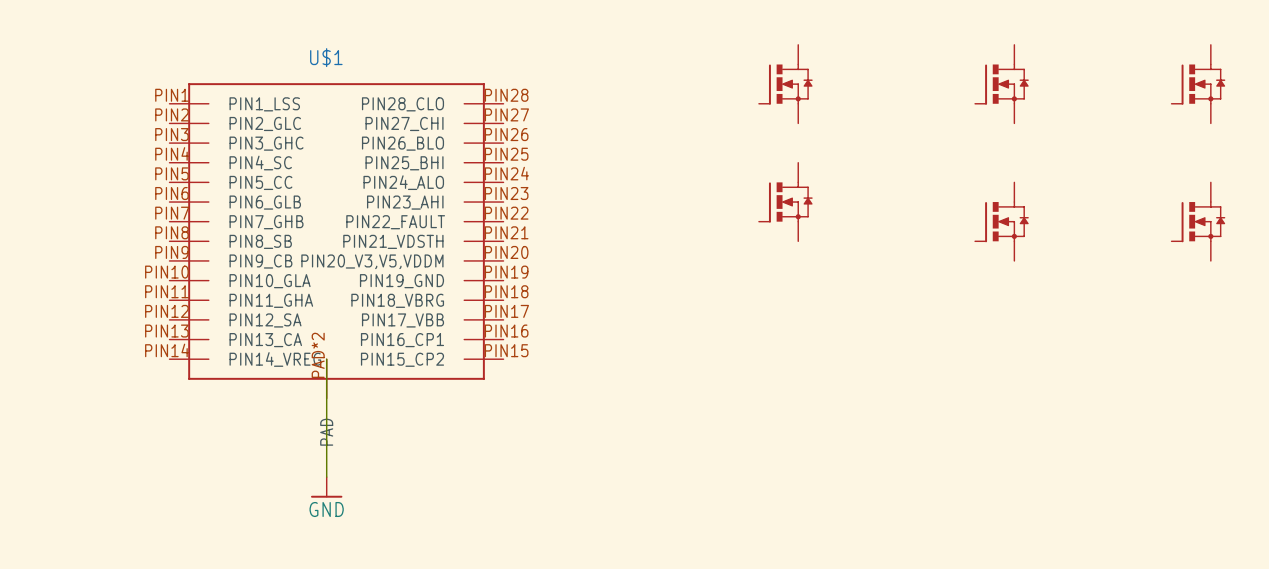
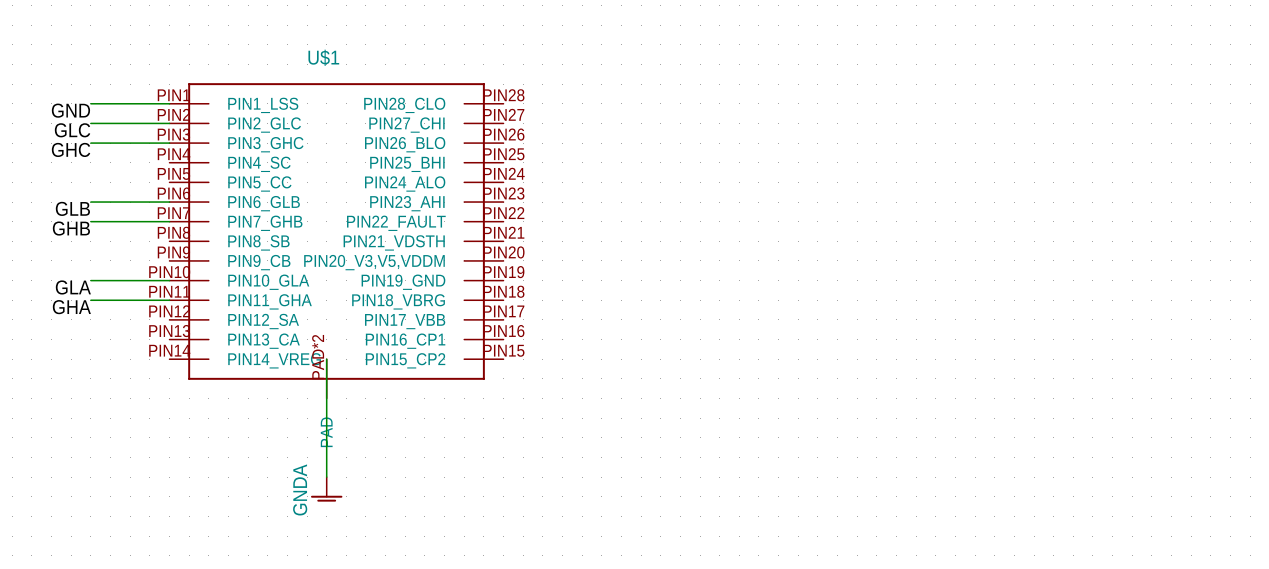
part: (785, 84) -> none
part: (1001, 84) -> none
part: (1198, 84) -> none
wire: none -> (90, 103) (169, 103)
label: none -> GND (70, 110)
wire: none -> (90, 123) (169, 123)
label: none -> GLC (72, 130)
wire: none -> (90, 143) (169, 143)
label: none -> GHC (71, 149)
wire: none -> (90, 202) (169, 202)
part: (785, 202) -> none
label: none -> GLB (72, 208)
wire: none -> (90, 221) (169, 221)
part: (1001, 221) -> none
part: (1198, 221) -> none
label: none -> GHB (71, 228)
wire: none -> (90, 280) (169, 280)
label: none -> GLA (73, 287)
wire: none -> (90, 300) (169, 300)
label: none -> GHA (71, 307)
power symbol: GND (326, 487) -> GNDA (326, 489)

